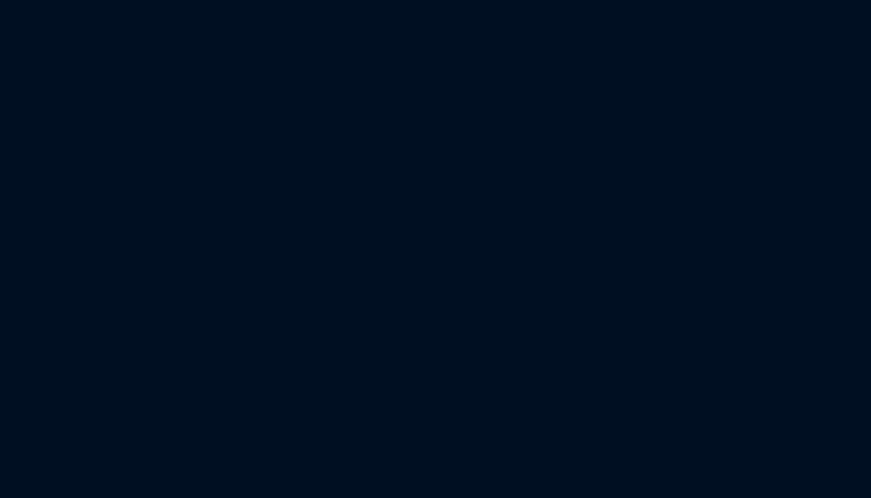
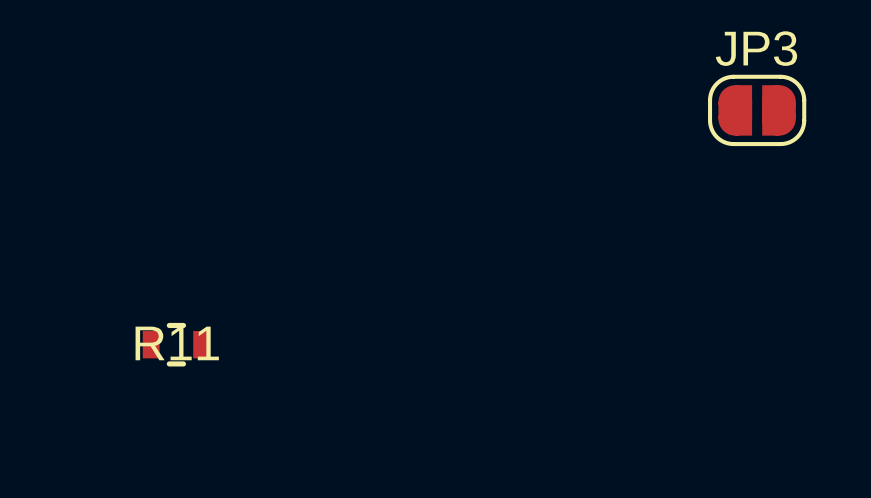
JP3: none -> (757, 110)
R11: none -> (176, 344)

